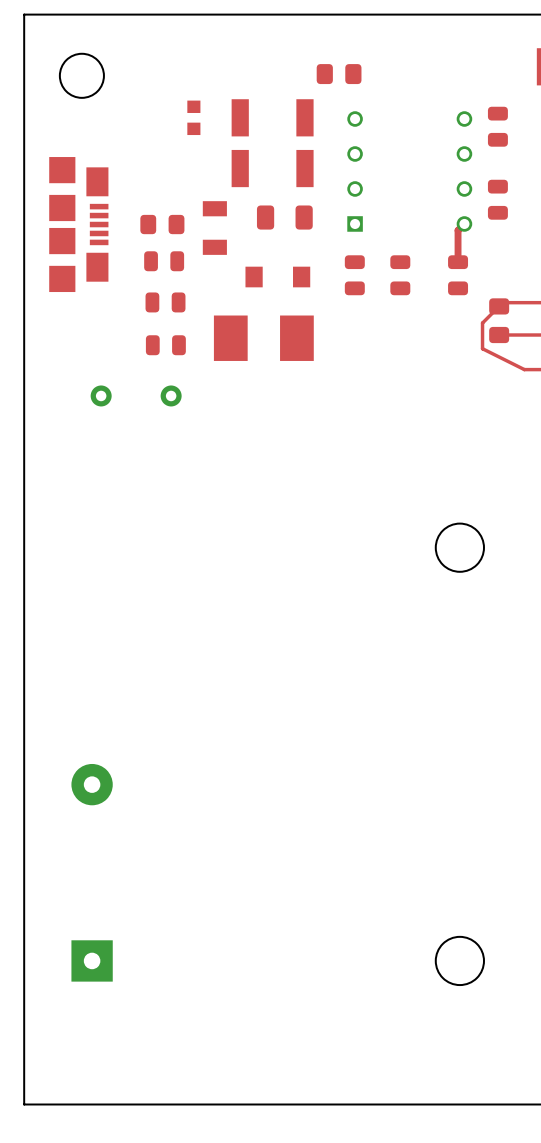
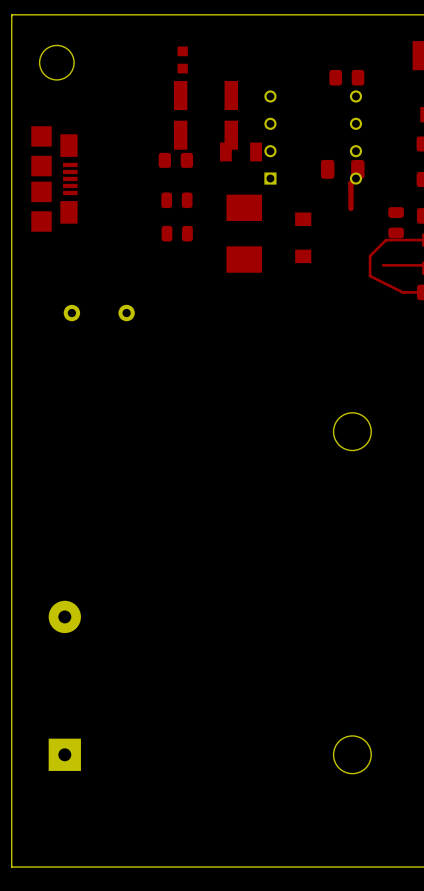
part: (339, 74) -> none
part: none -> (346, 77)
part position: (193, 117) -> (182, 59)
part: (497, 126) -> none
part: (497, 199) -> none
part position: (284, 217) -> (342, 169)
part position: (162, 224) -> (175, 160)
part rotation: 0° (214, 228) -> 90° clockwise (240, 151)
part position: (214, 228) -> (240, 151)
part: none -> (176, 200)
part: (164, 261) -> none
part: (354, 275) -> none
part: (400, 275) -> none
part: (458, 275) -> none
part rotation: 0° (277, 277) -> 90° clockwise (303, 237)
part position: (277, 277) -> (303, 237)
part: none -> (396, 222)
part: none -> (177, 233)
part: (165, 302) -> none
part: (499, 320) -> none
part rotation: 0° (263, 338) -> 90° clockwise (244, 233)
part position: (263, 338) -> (244, 233)
part: (165, 345) -> none

